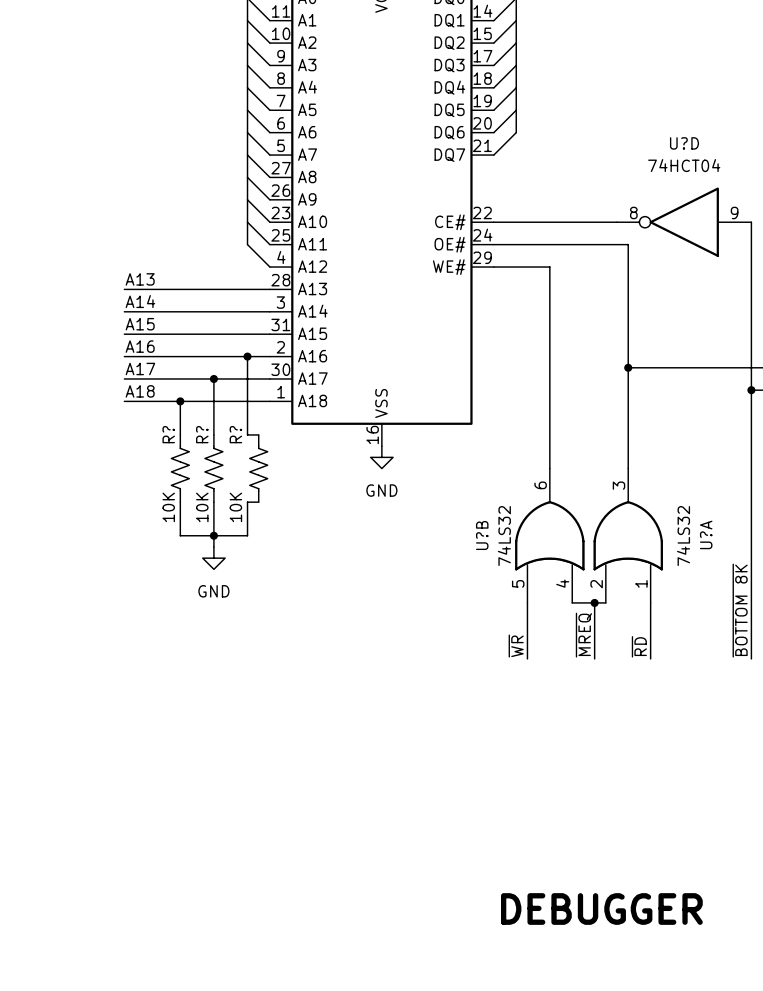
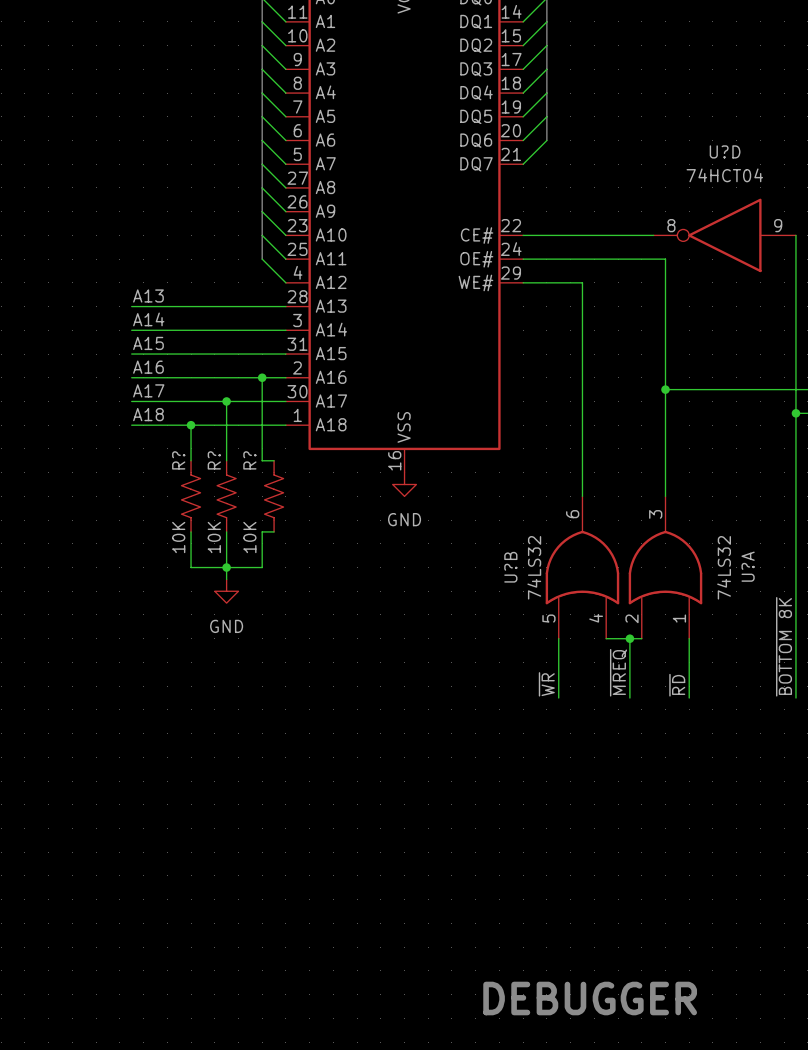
text position: DEBUGGER (601, 909) -> DEBUGGER (590, 998)

